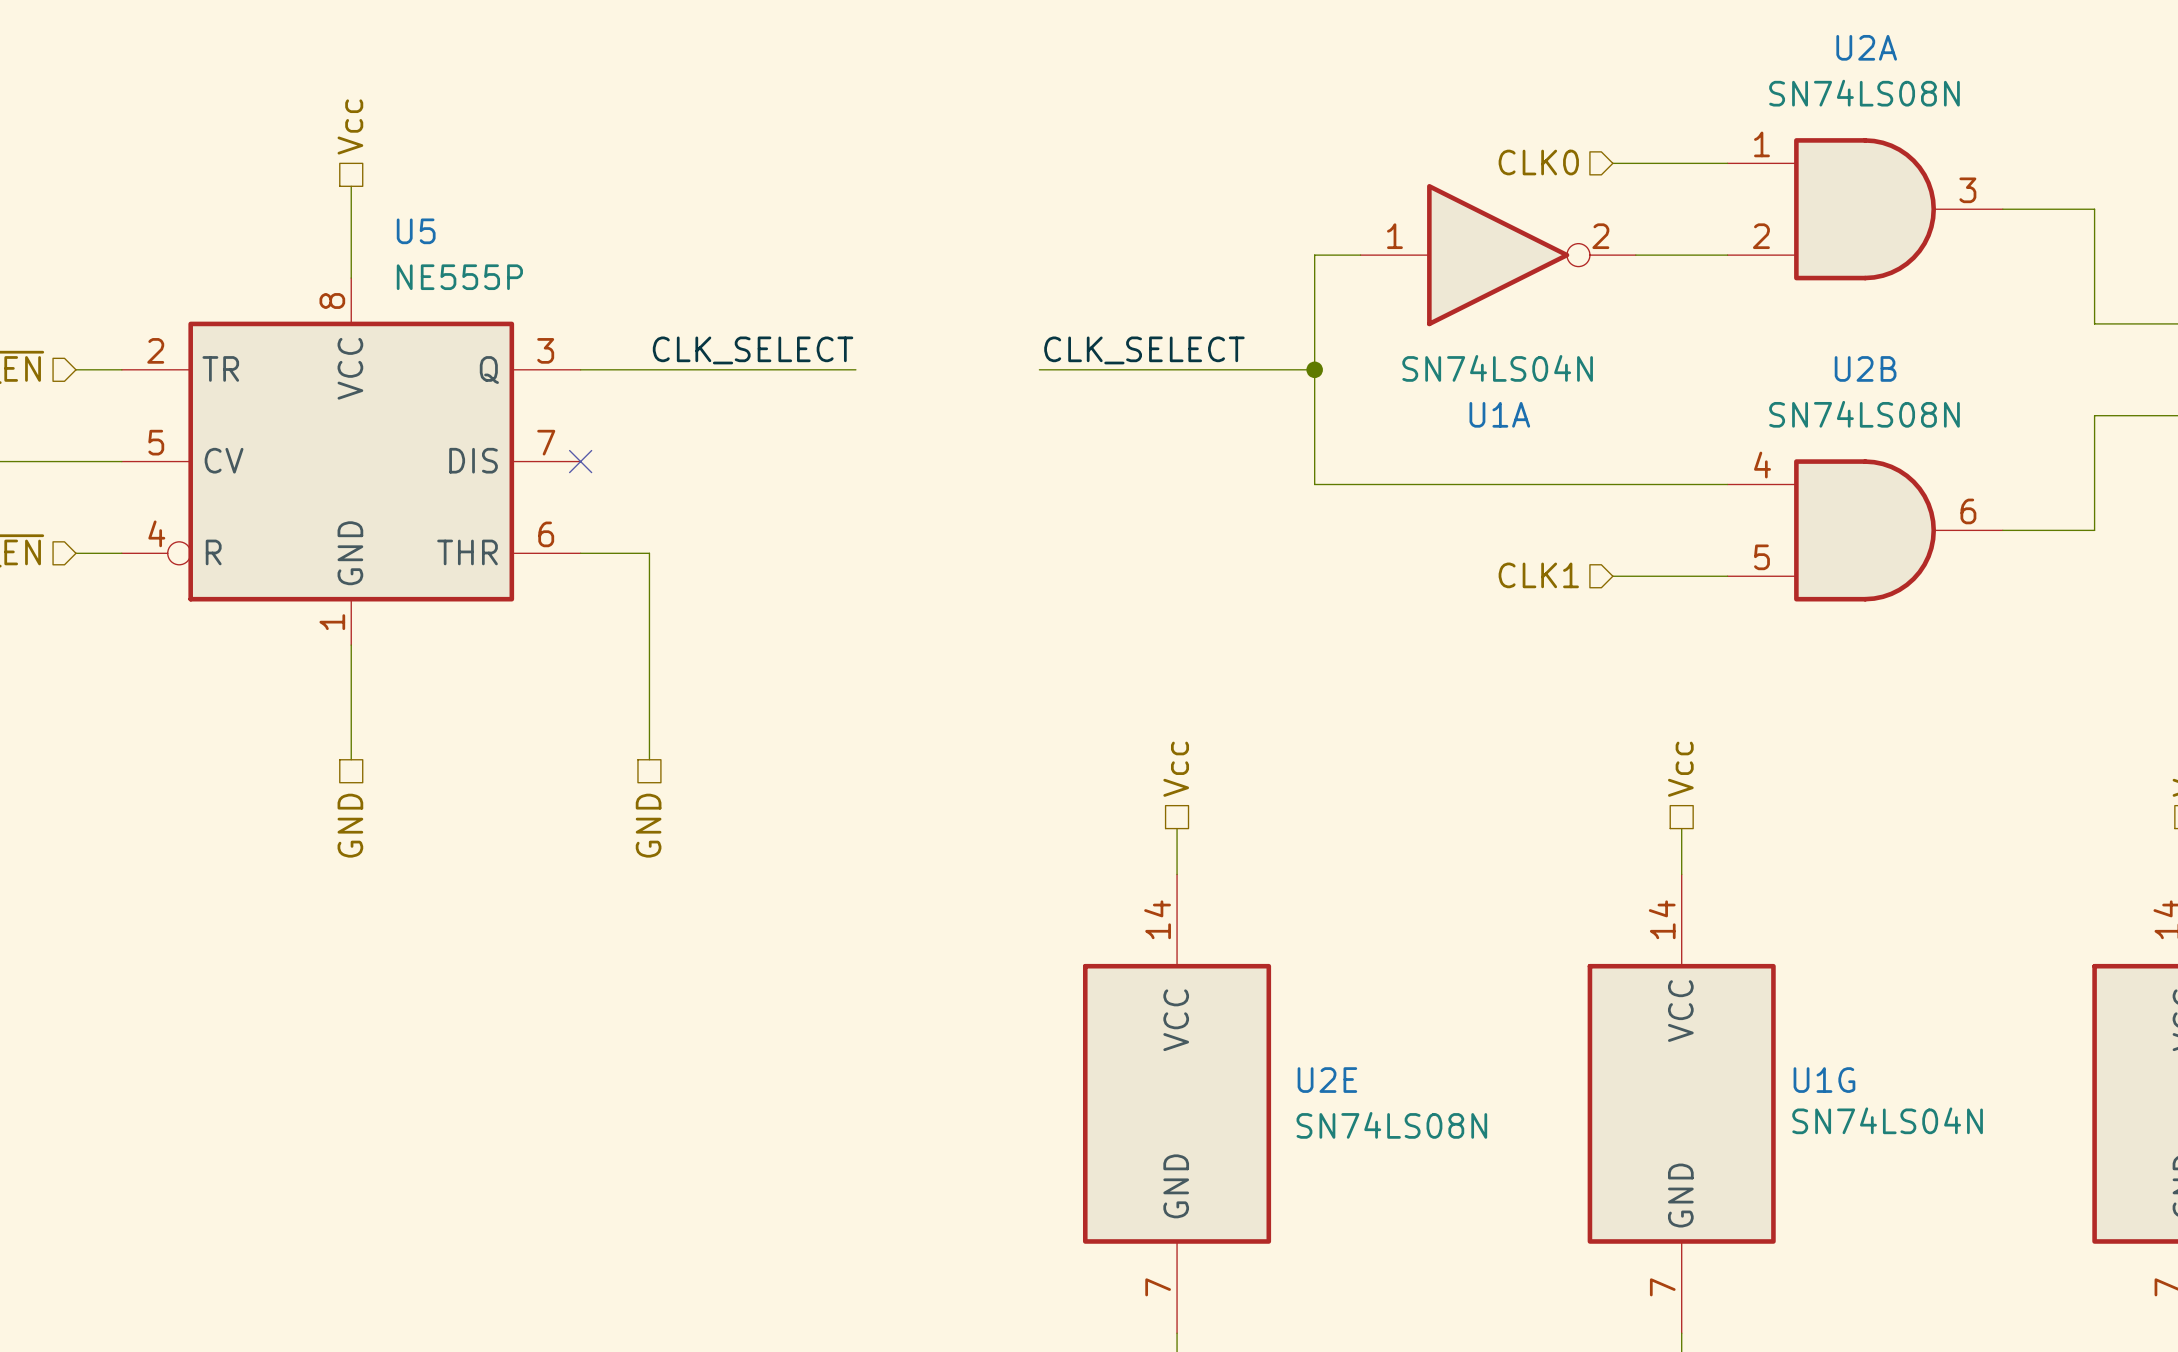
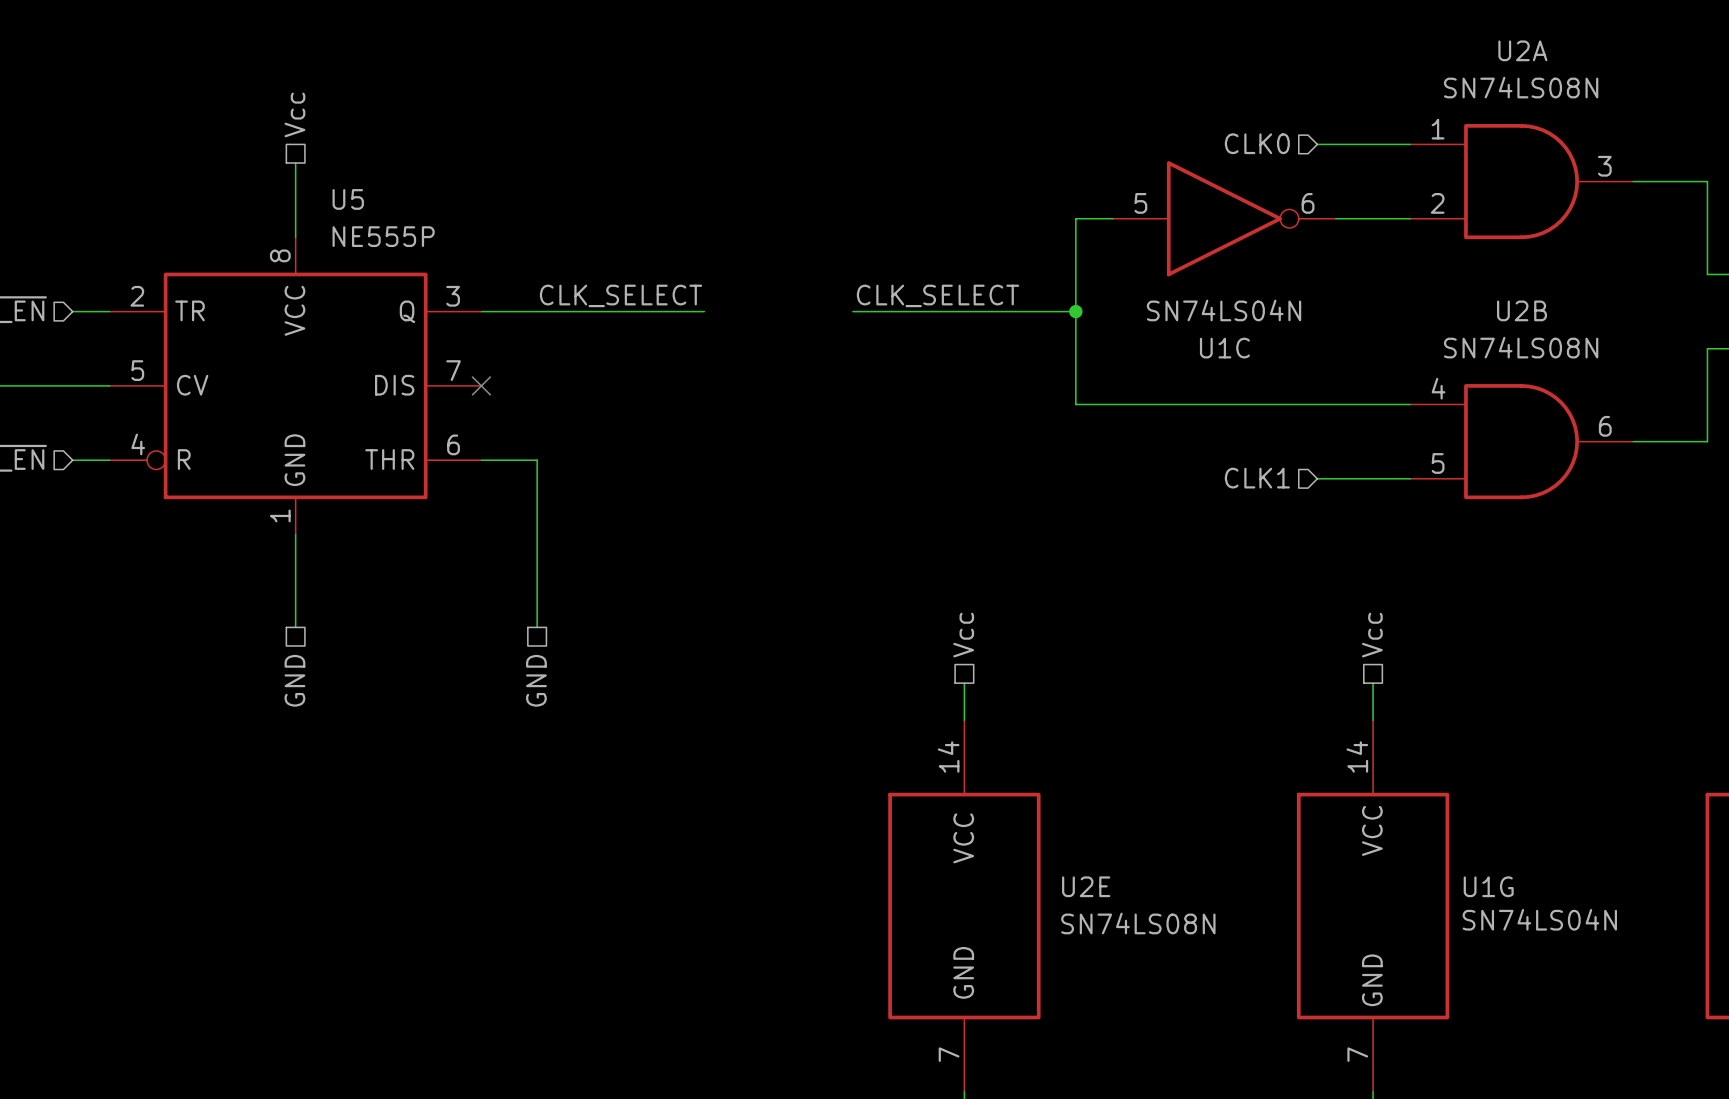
U1A pin number: 1 (1394, 236) -> 5 (1140, 203)
U1A pin number: 2 (1600, 236) -> 6 (1308, 203)
U1A name: U1A (1499, 414) -> U1C (1224, 348)

